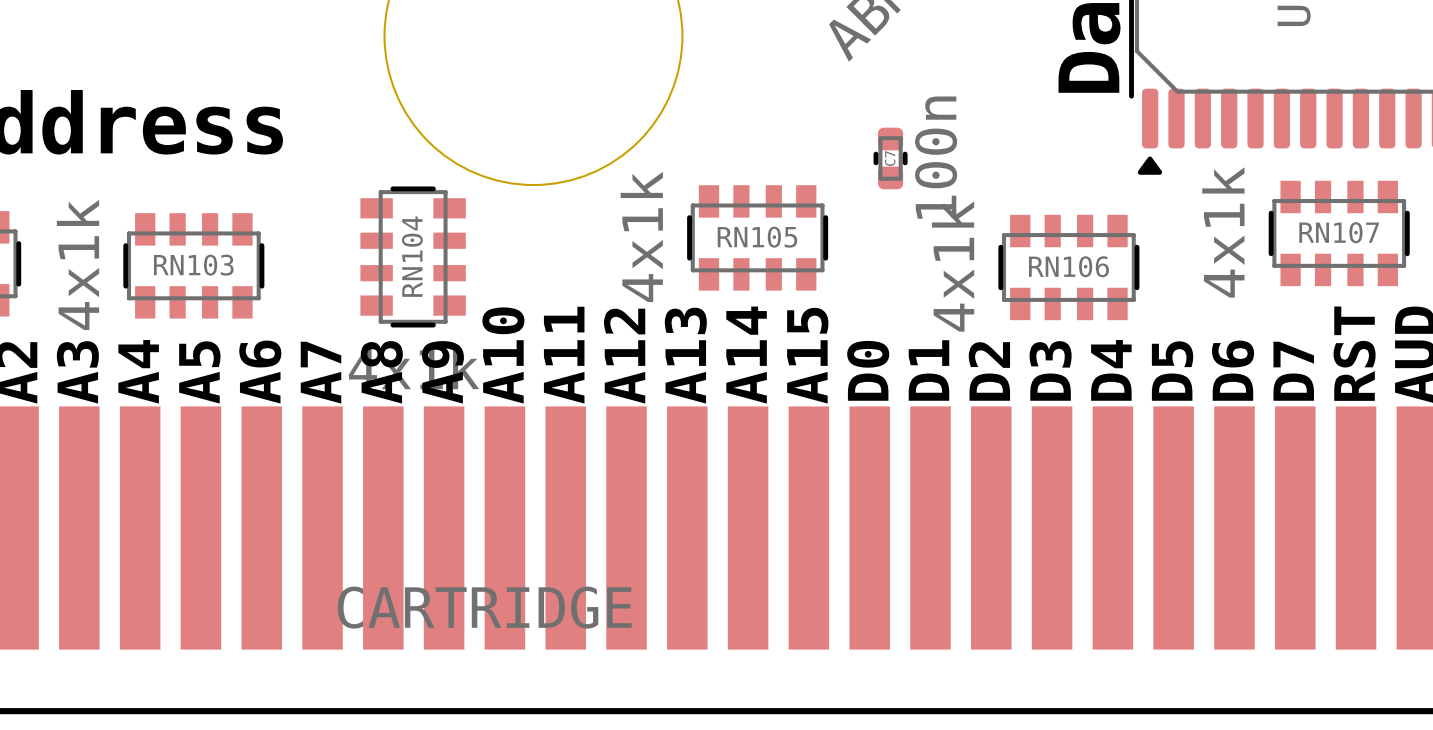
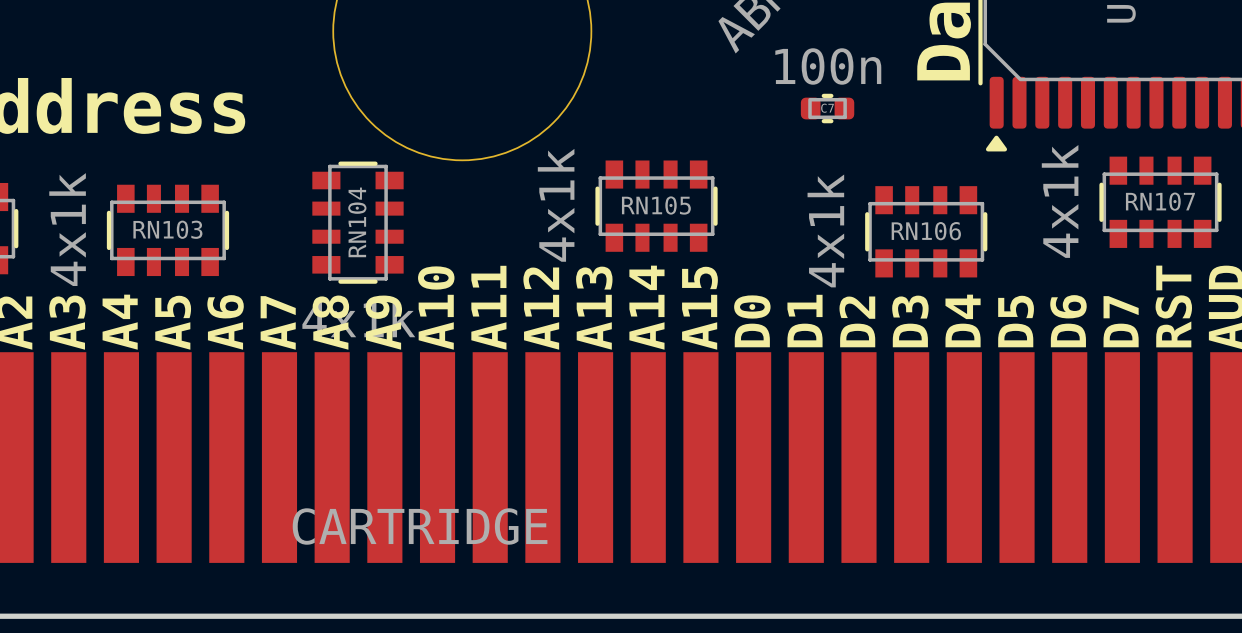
C7 rotation: 0° (890, 158) -> 90° clockwise (827, 108)
C7 position: (890, 158) -> (827, 108)

